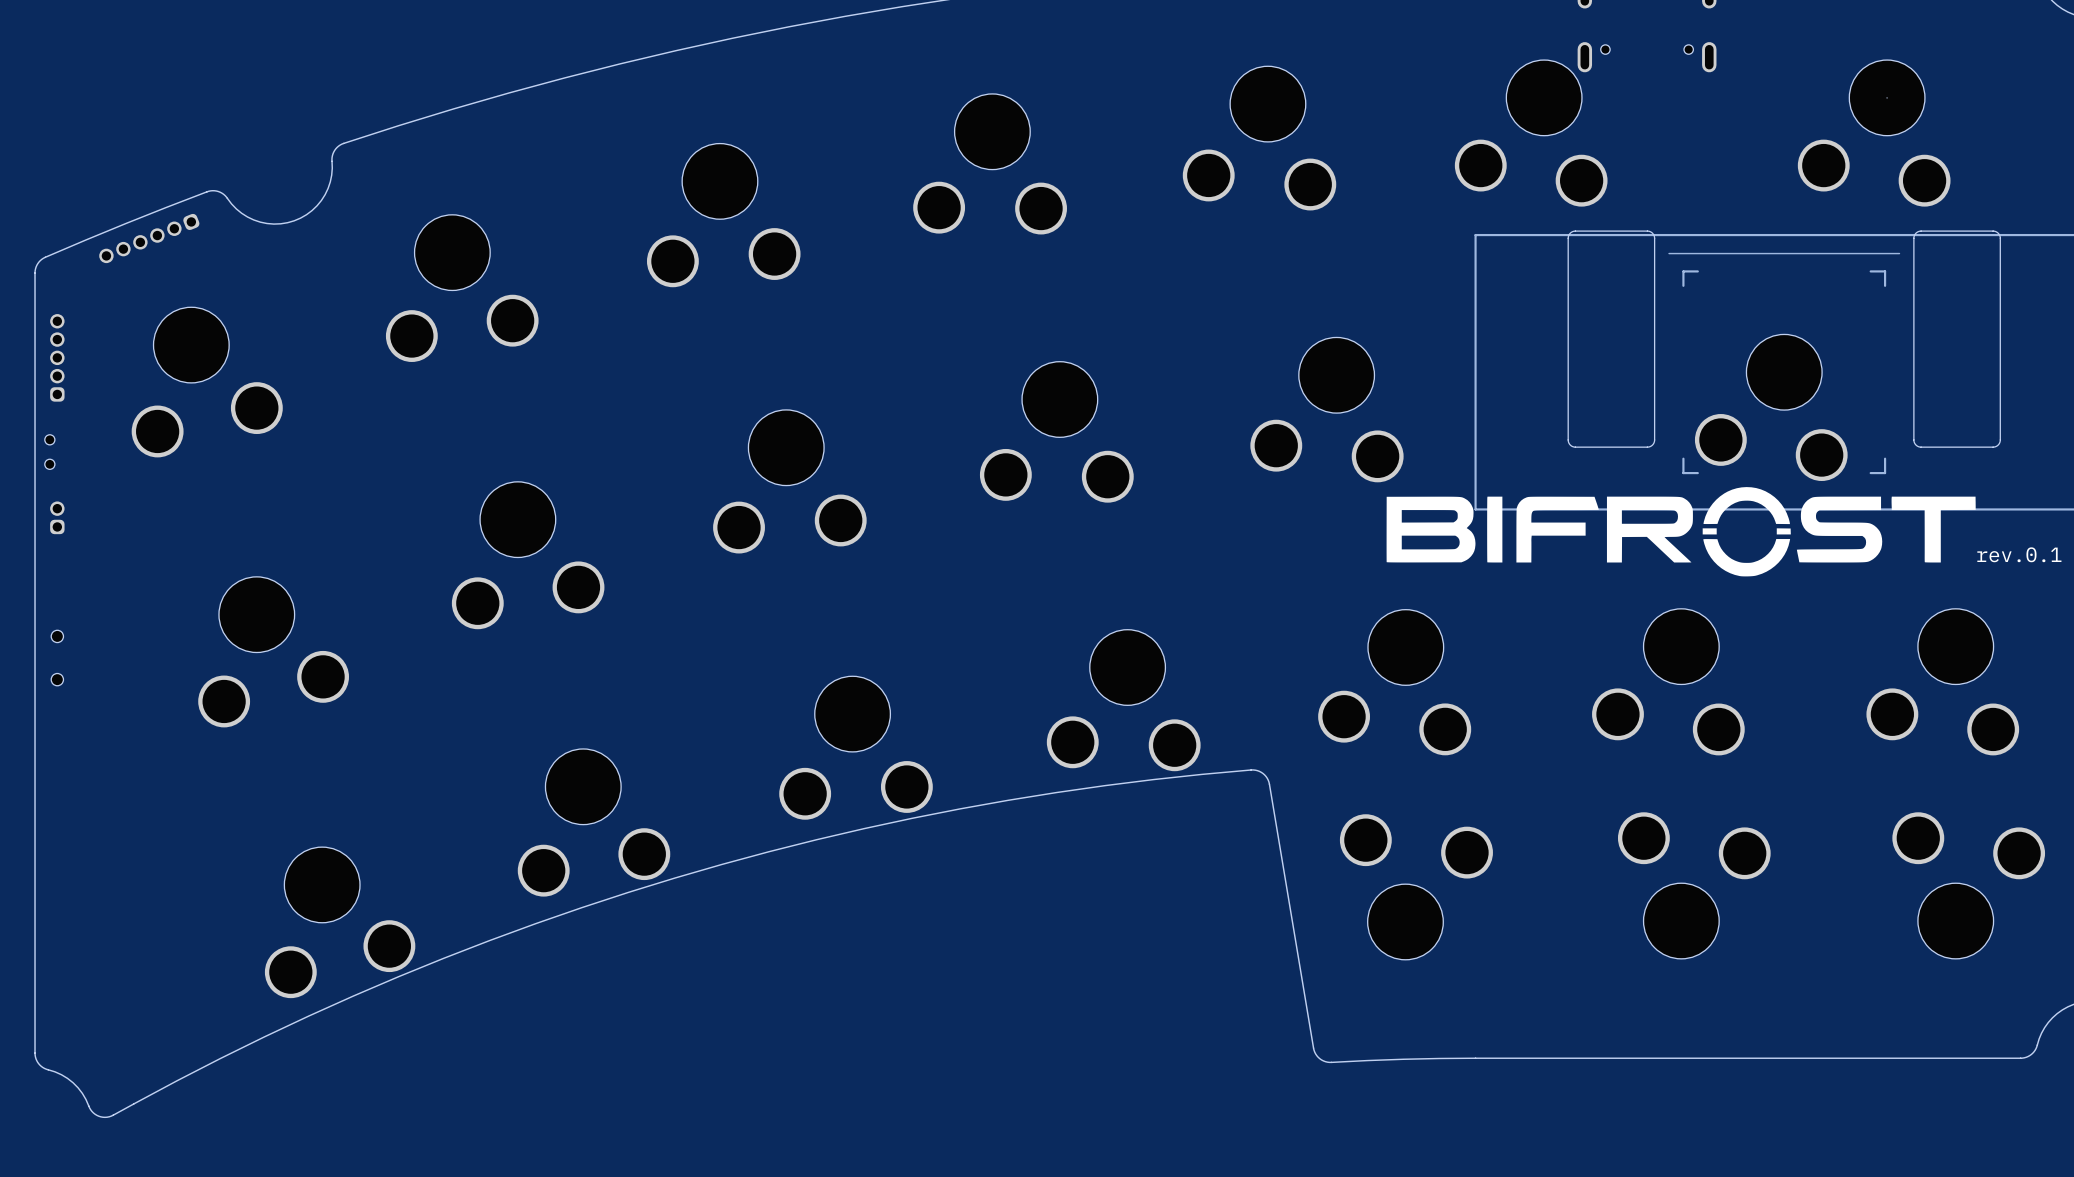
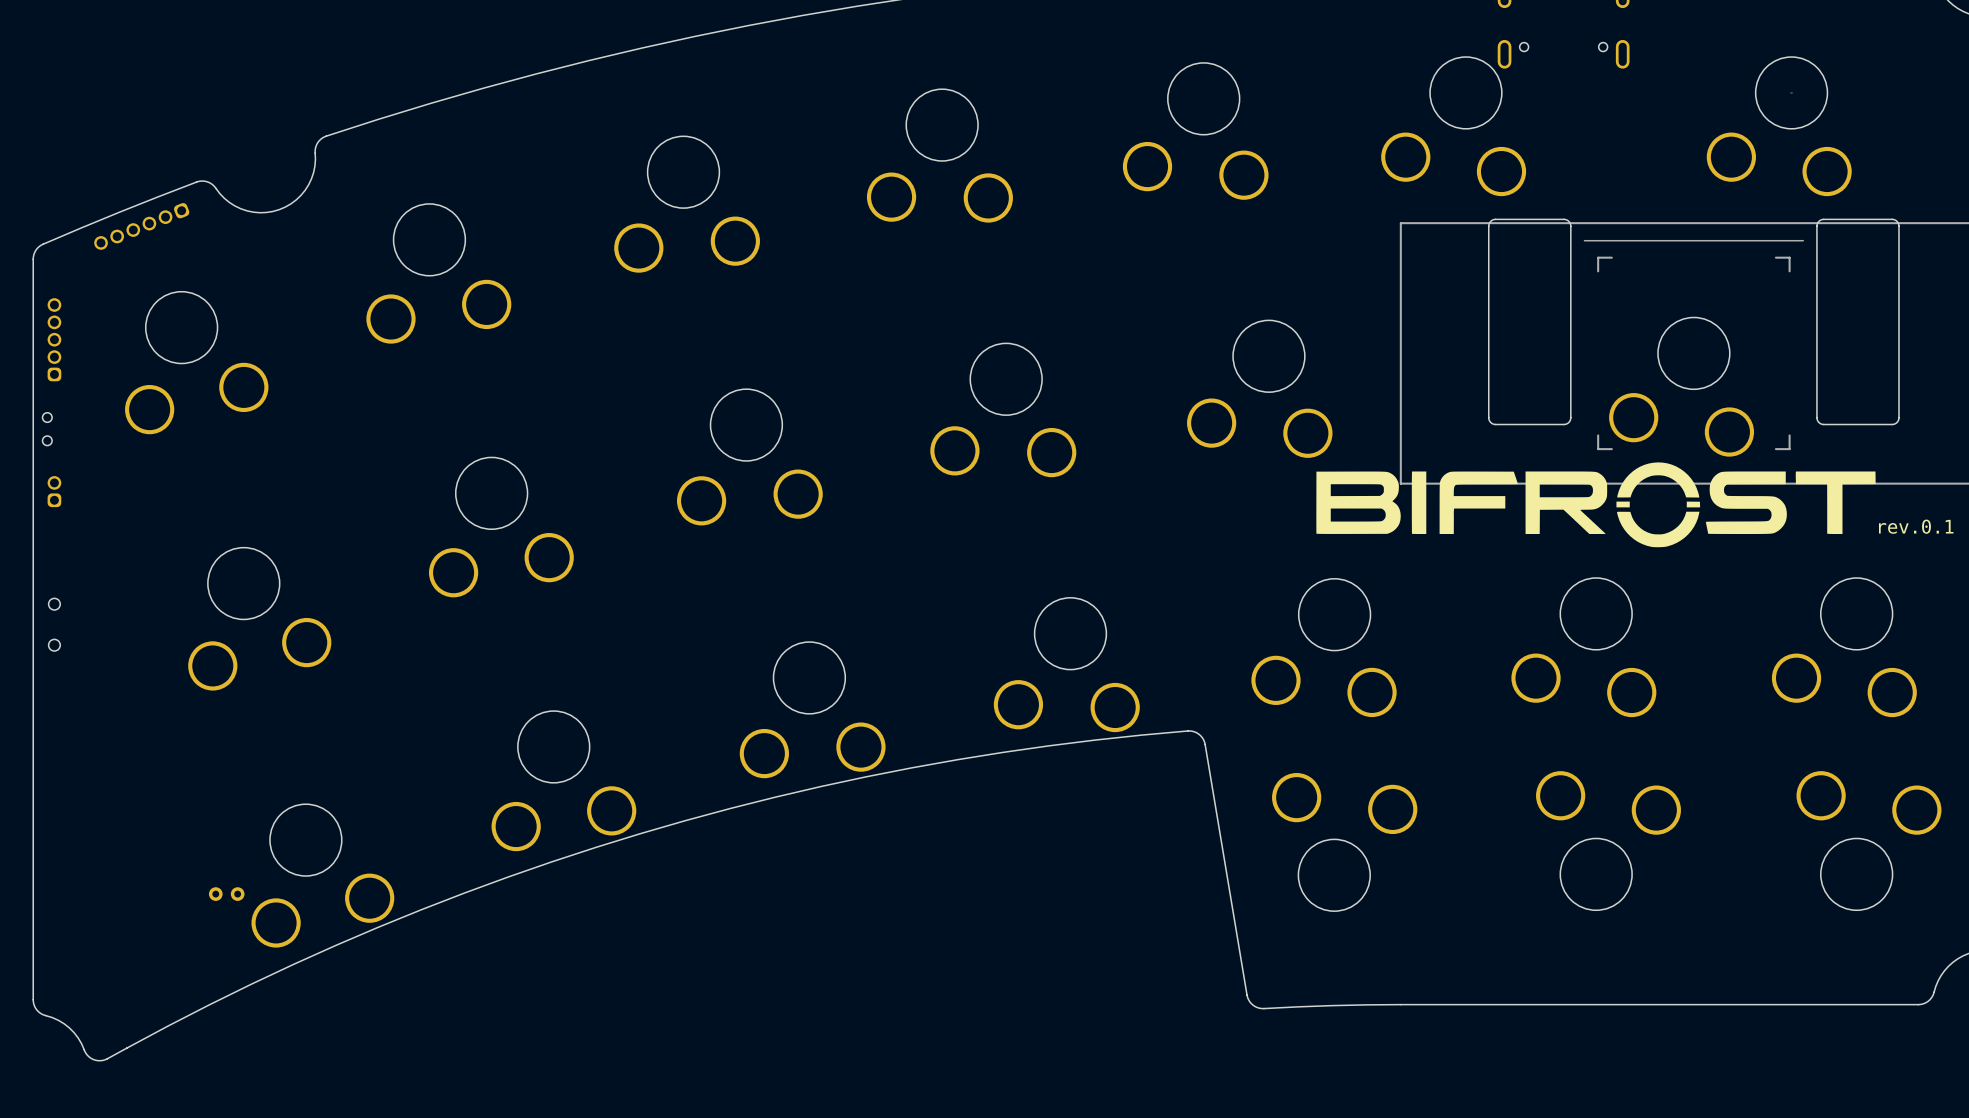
part: none -> (215, 894)
part: none -> (237, 894)

